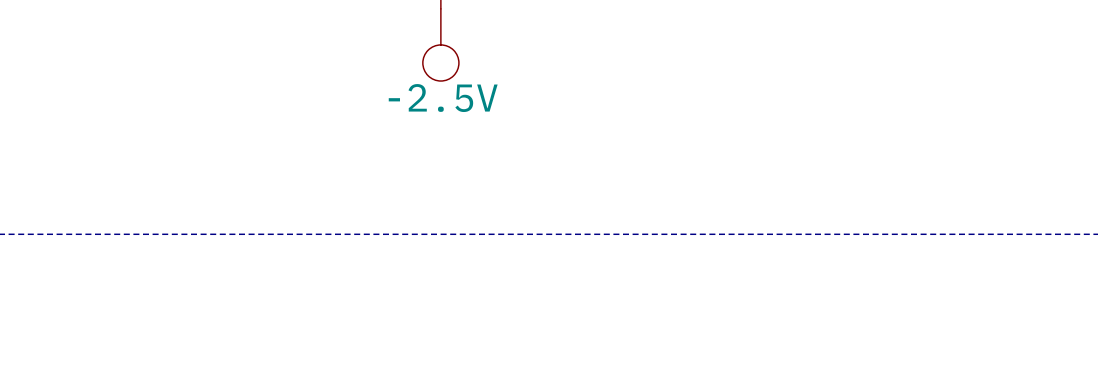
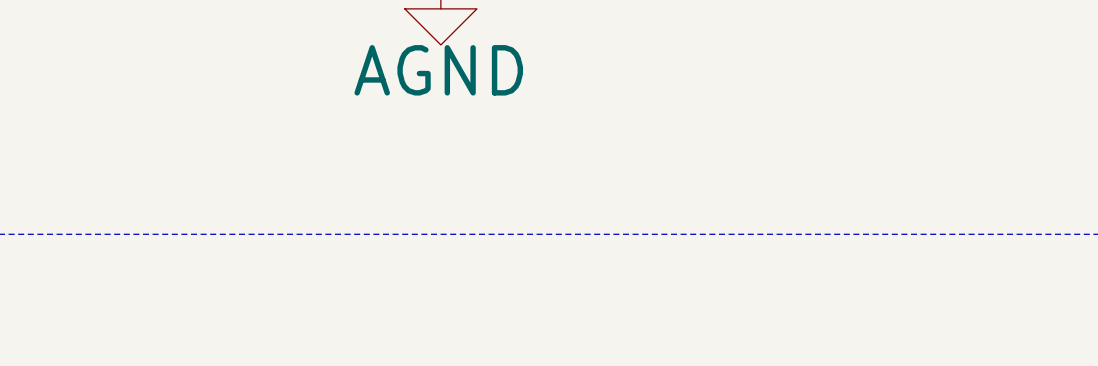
power symbol: -2.5V (440, 44) -> AGND (440, 26)

